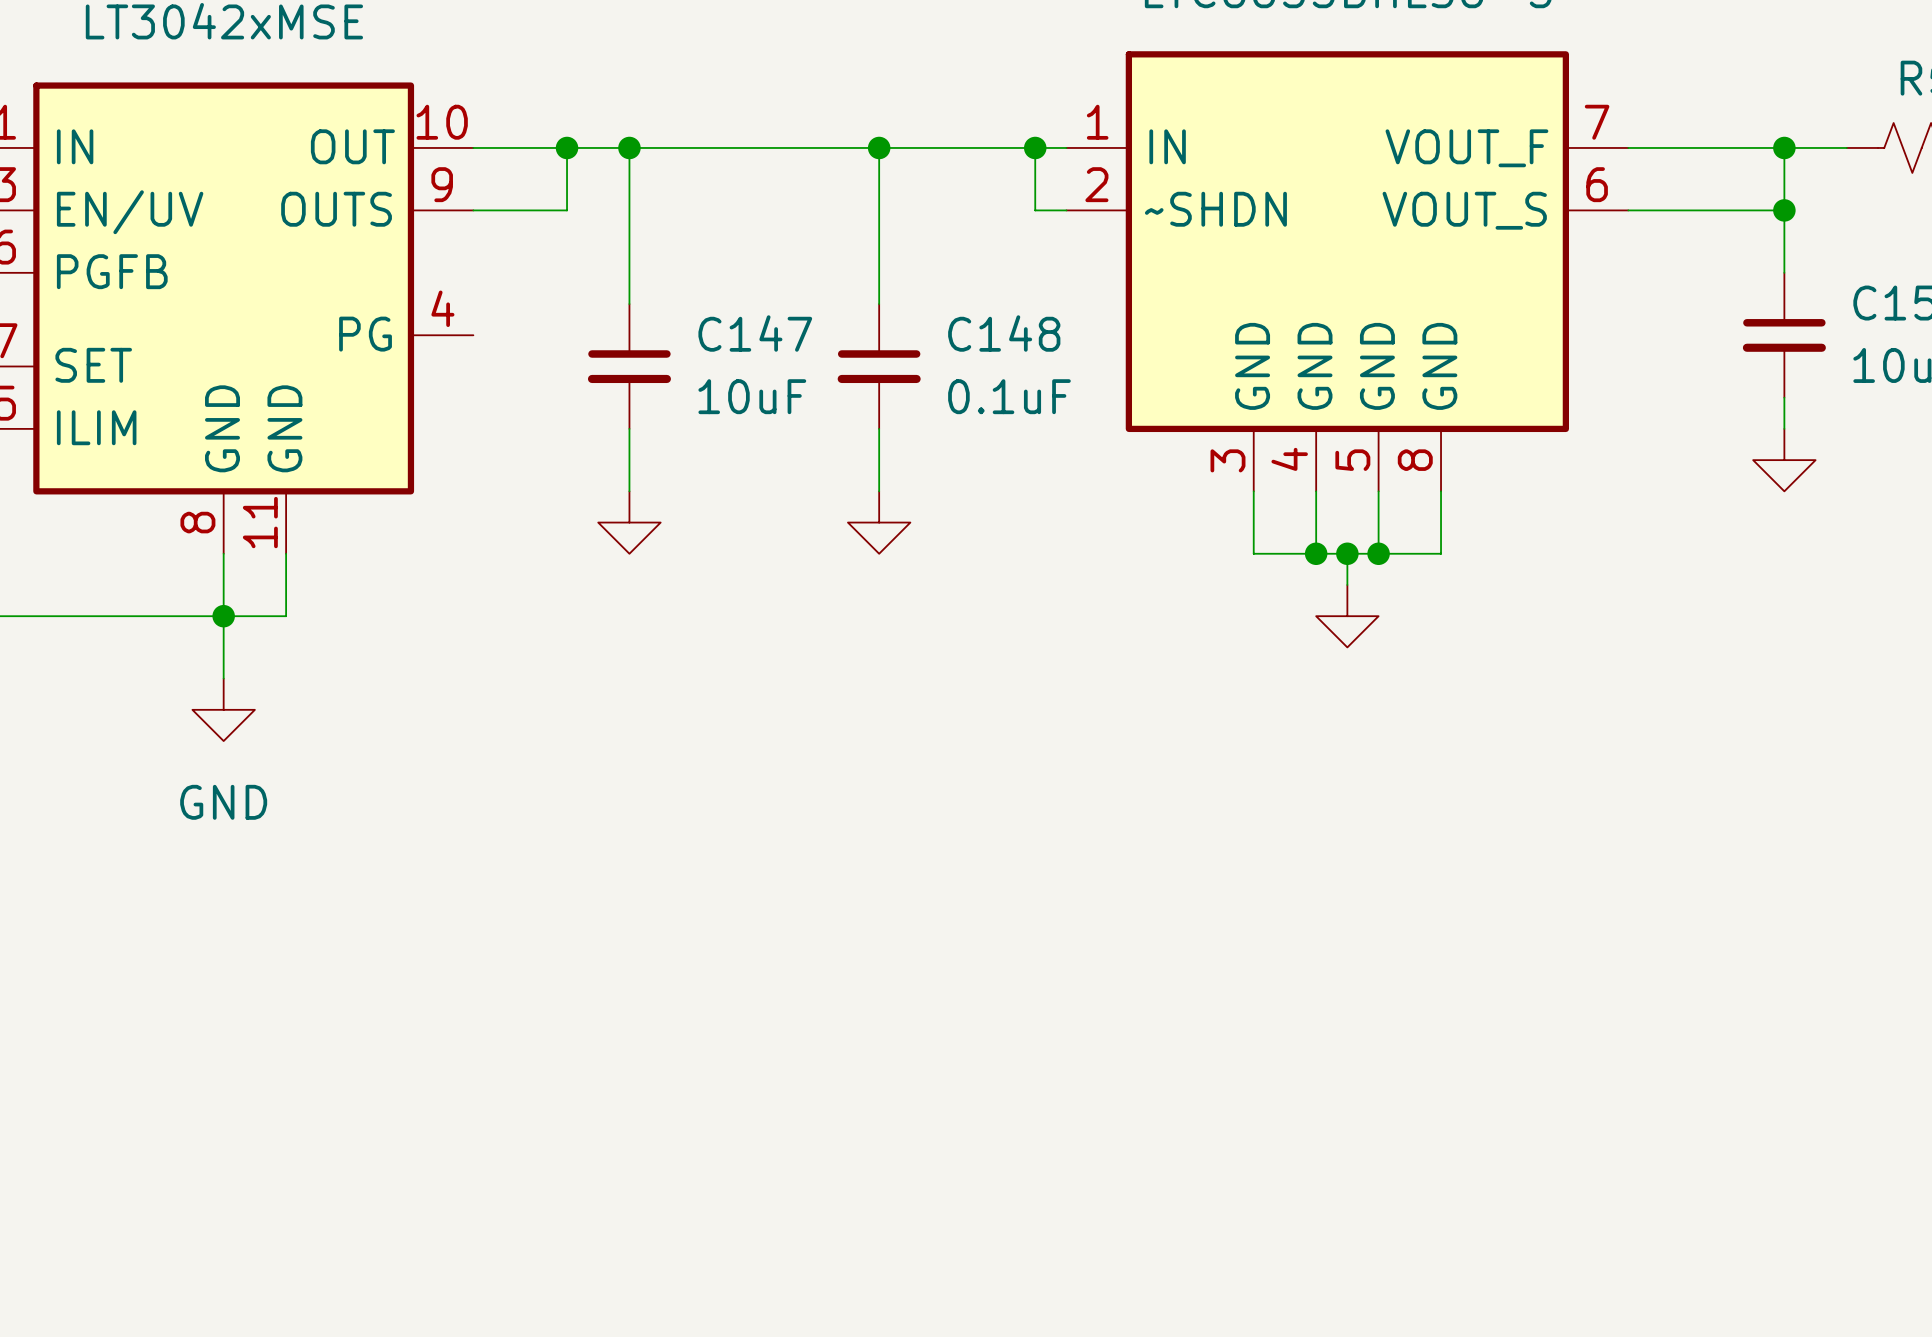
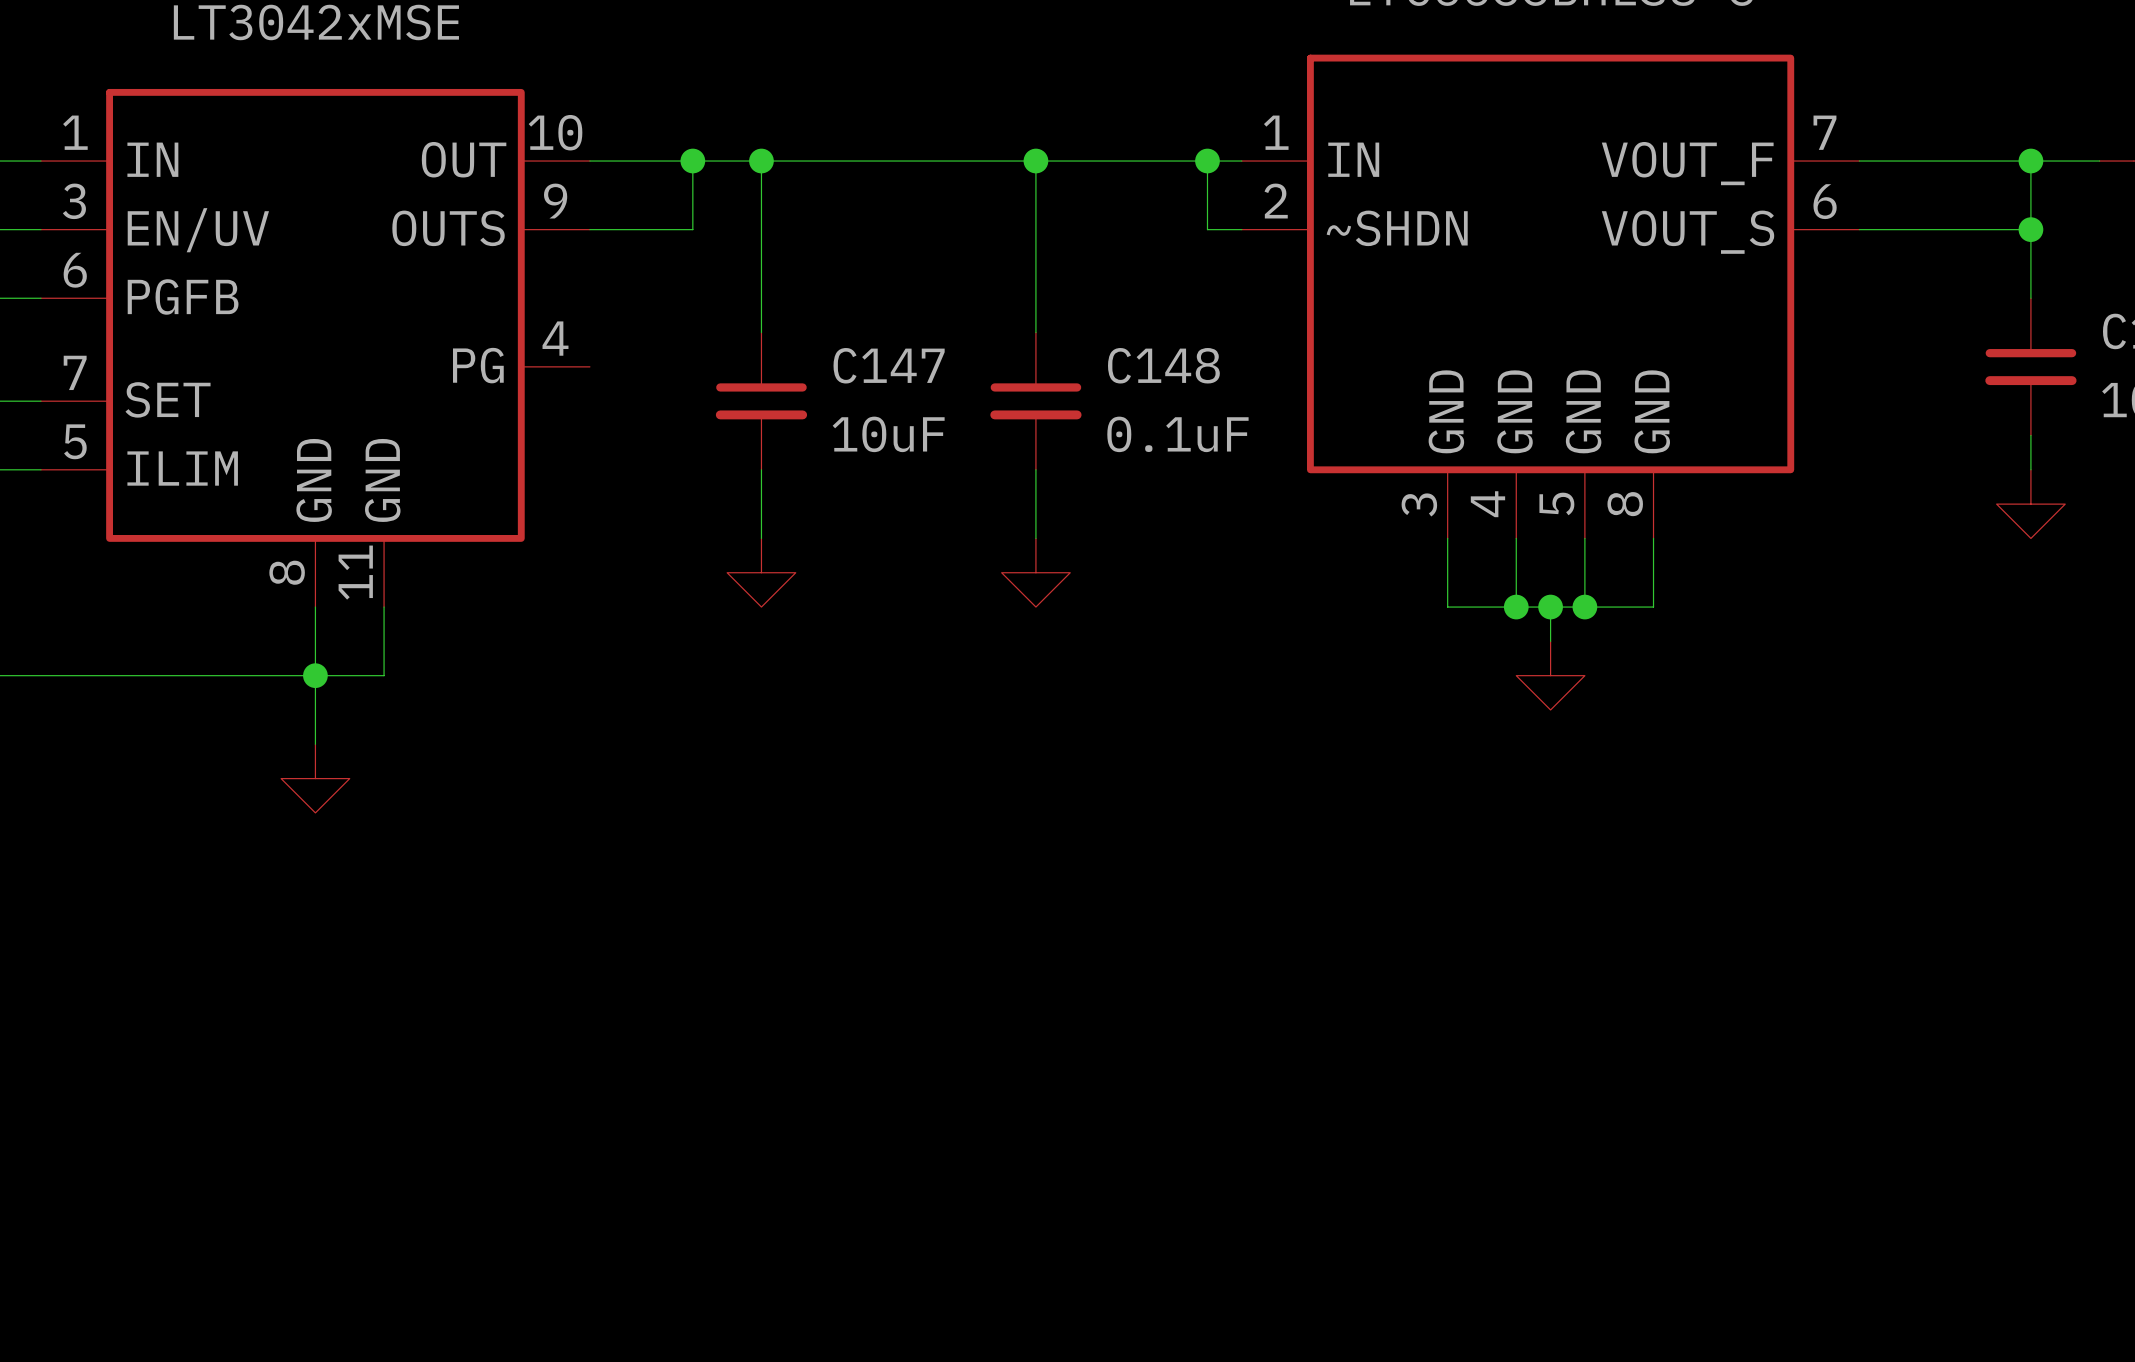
power symbol text: GND (223, 802) -> none

